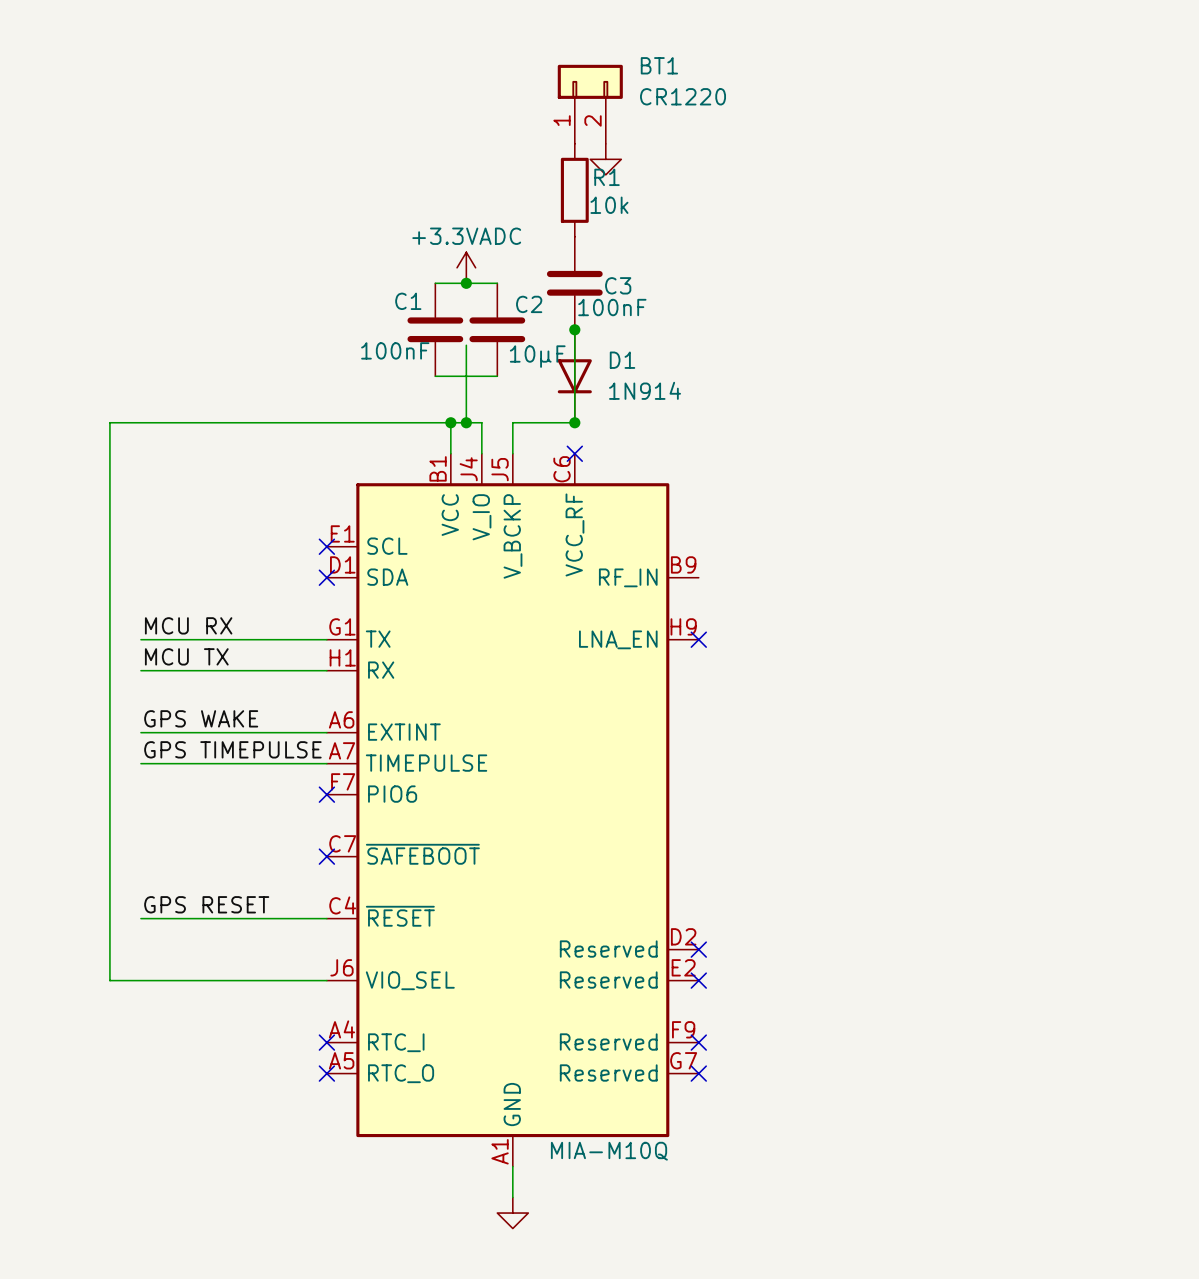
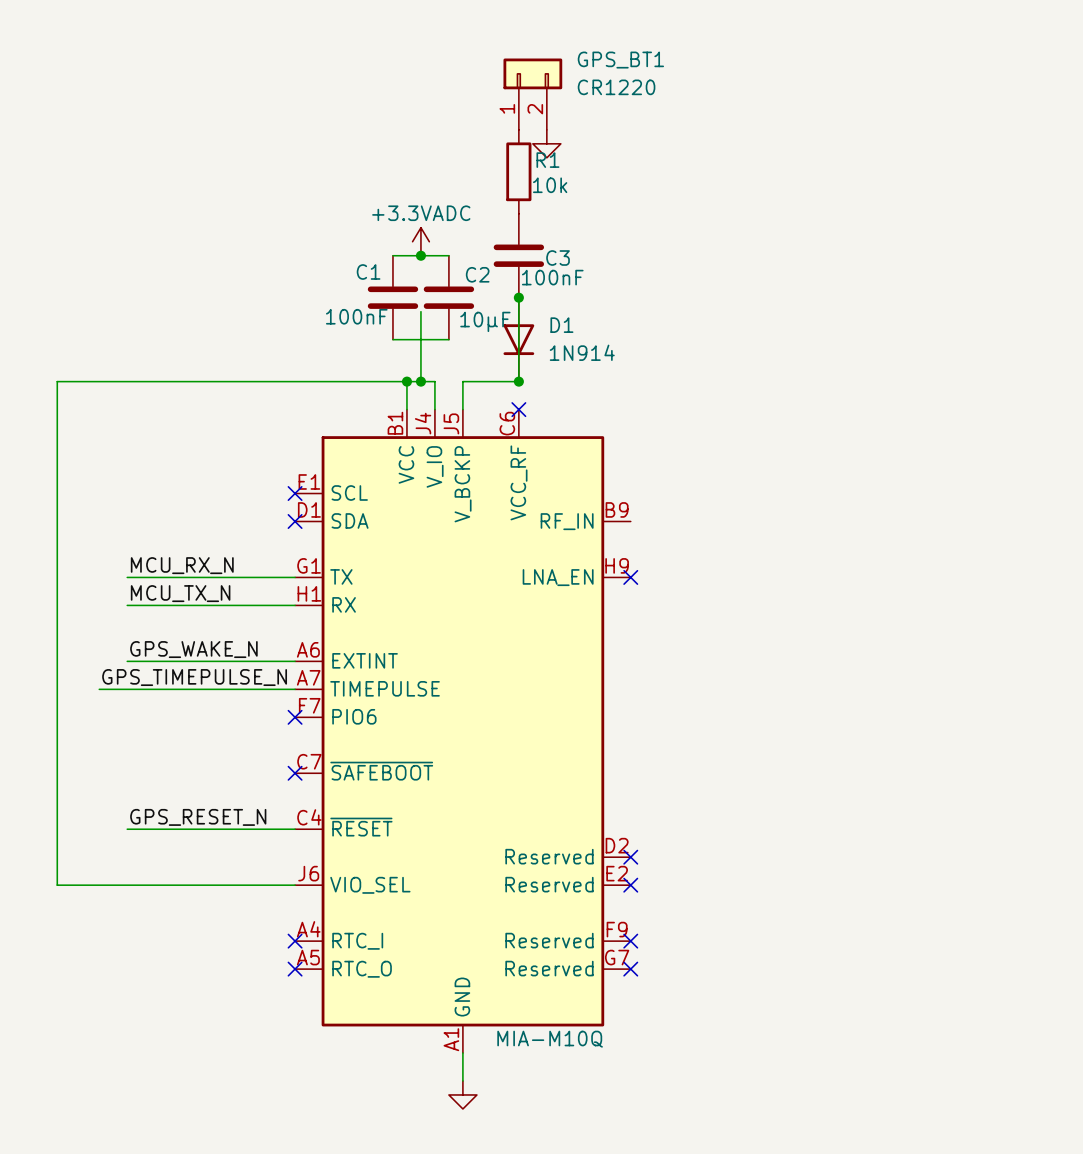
BT1 name: BT1 (659, 65) -> GPS_BT1 (620, 60)
wire: (109, 422) (109, 980) -> (99, 381) (57, 381) (57, 885) (99, 885)
label: MCU RX (188, 625) -> MCU_RX_N (182, 565)
label: MCU TX (186, 656) -> MCU_TX_N (180, 593)
label: GPS WAKE (201, 718) -> GPS_WAKE_N (193, 649)
label: GPS TIMEPULSE (232, 749) -> GPS_TIMEPULSE_N (194, 677)
wire: none -> (99, 689) (127, 689)
label: GPS RESET (206, 904) -> GPS_RESET_N (198, 817)

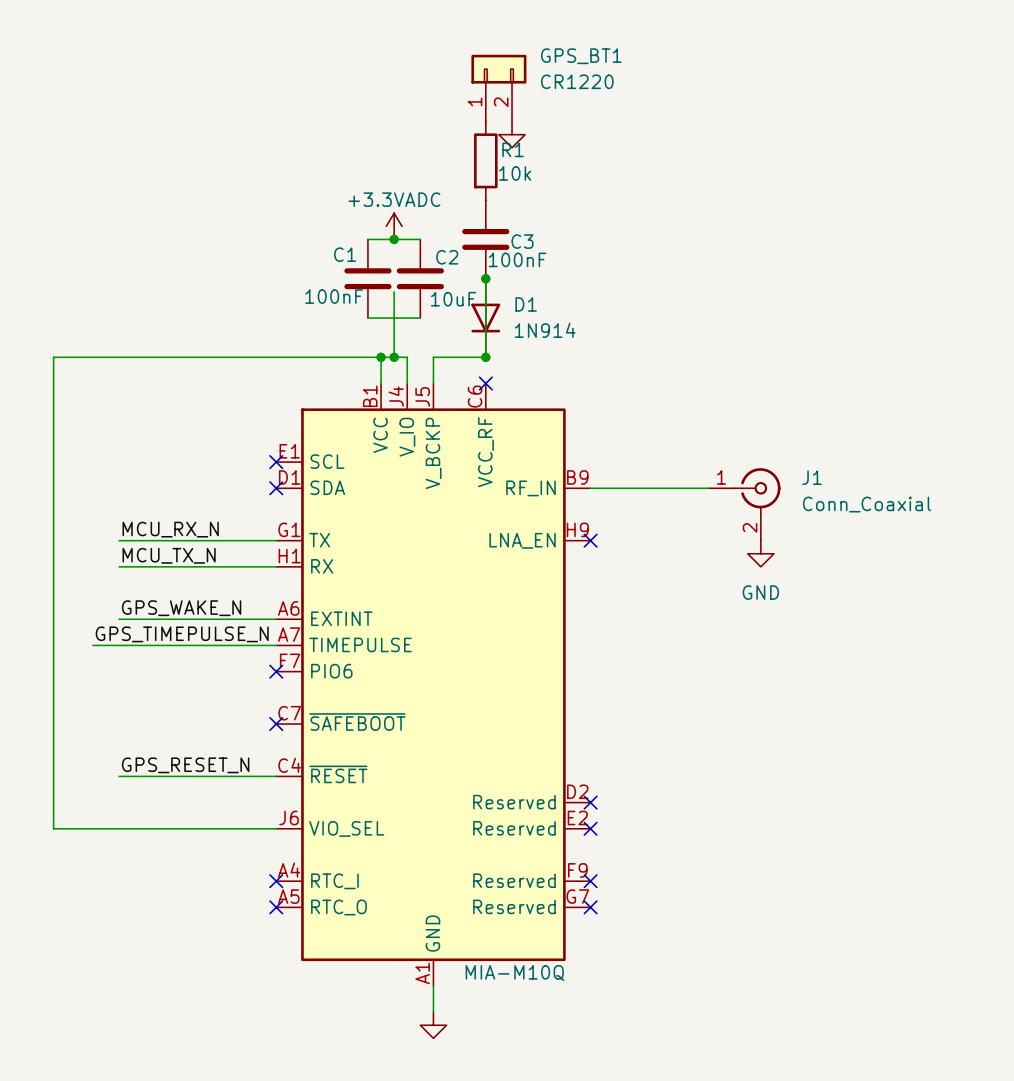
C2 value: 10µF (485, 321) -> 10uF (453, 299)
wire: none -> (590, 488) (708, 488)
J1: none -> Conn_Coaxial (744, 504)
power symbol: none -> GND (760, 553)

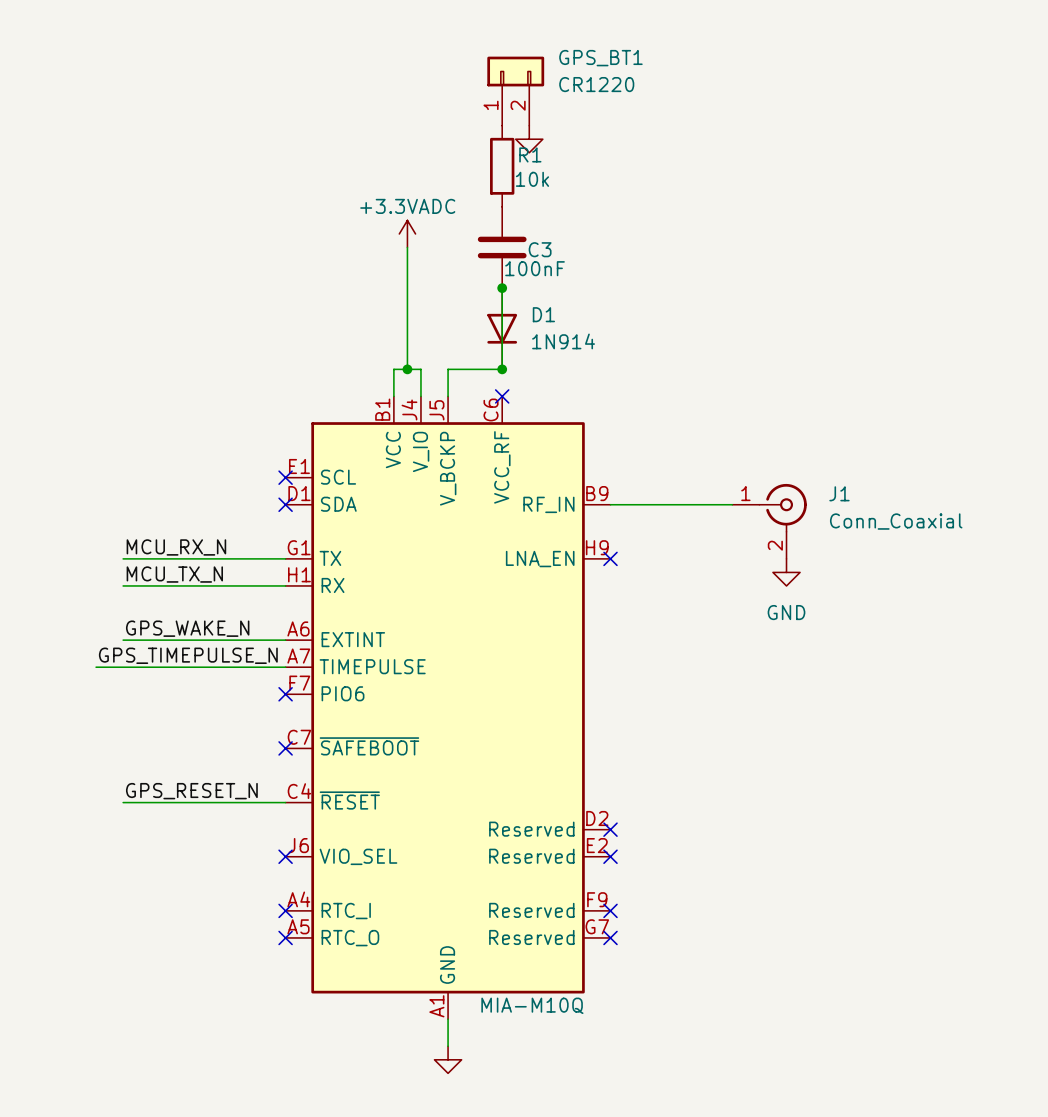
wire: (367, 239) (420, 239) -> none
wire: none -> (407, 247) (407, 301)
junction: (394, 239) -> none
C1: 100nF (367, 278) -> none
C2: 10uF (420, 278) -> none
wire: (367, 318) (420, 318) -> none
wire: (381, 357) (53, 357) (53, 828) (276, 828) -> none
junction: (381, 357) -> none
no-connect mark: none -> (285, 856)

